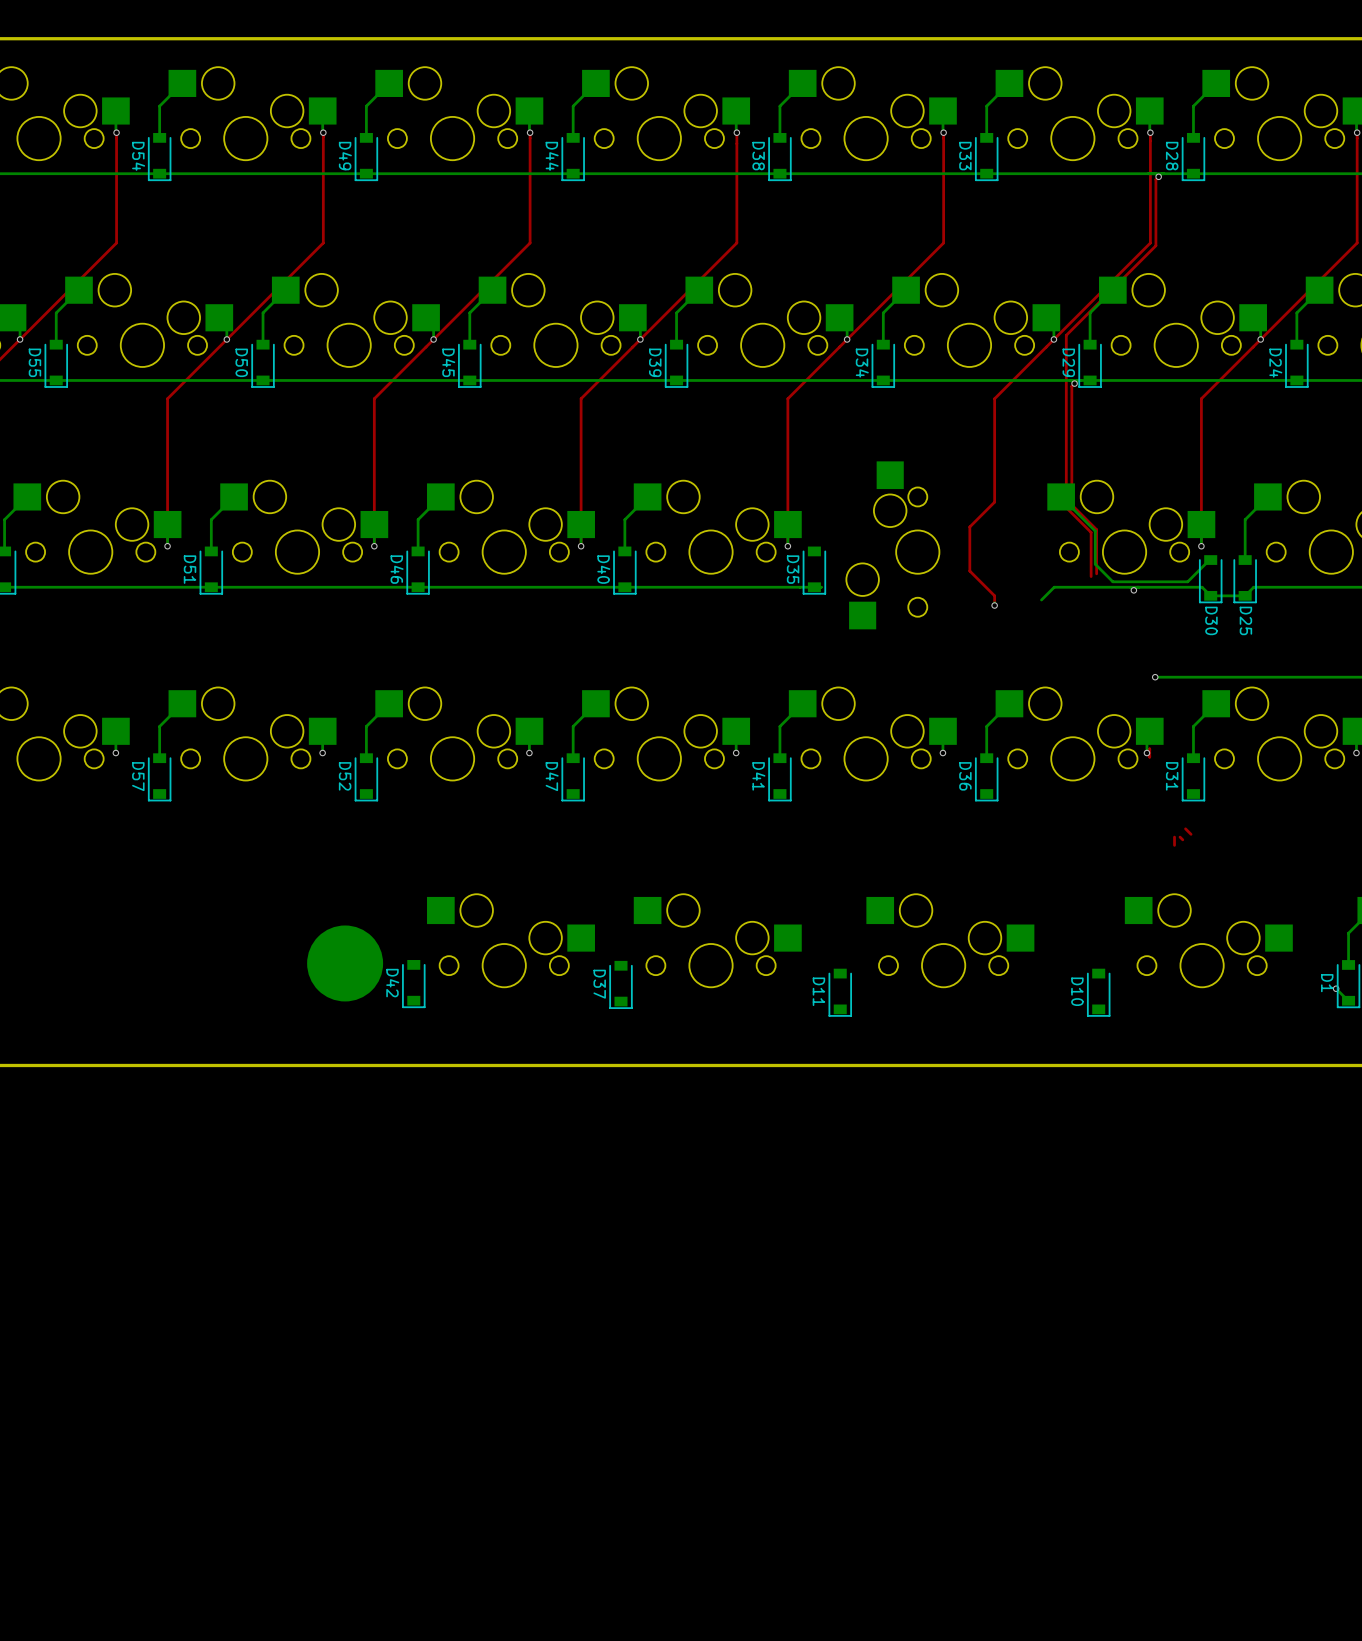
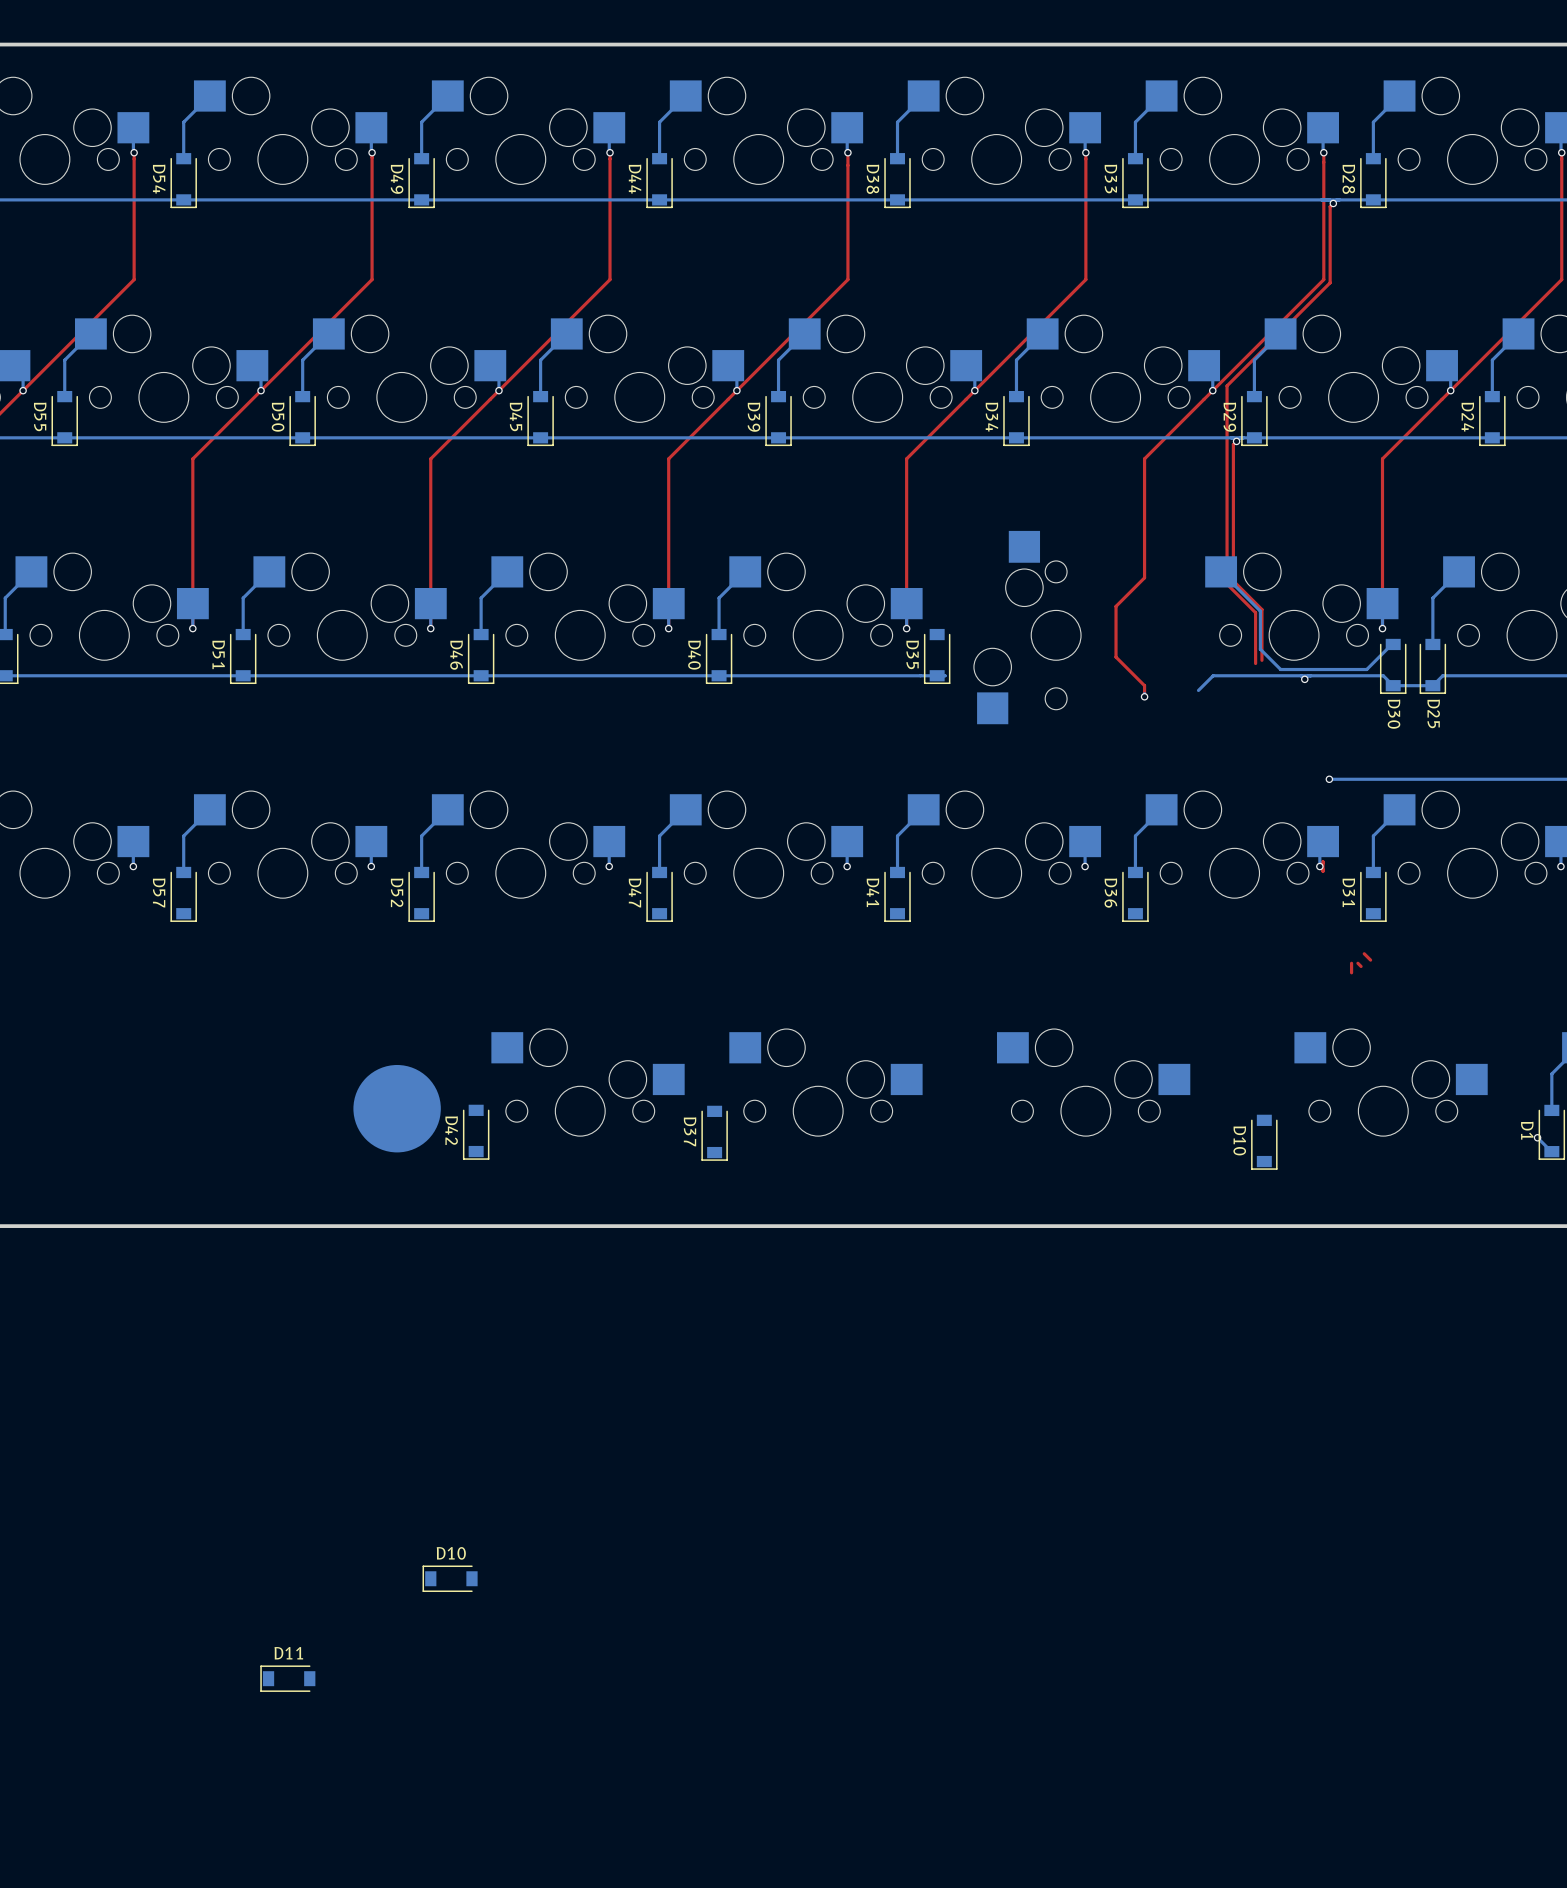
D11 rotation: 0° (840, 992) -> 90° clockwise (287, 1678)
D11 position: (840, 992) -> (287, 1678)
D10: none -> (450, 1578)

